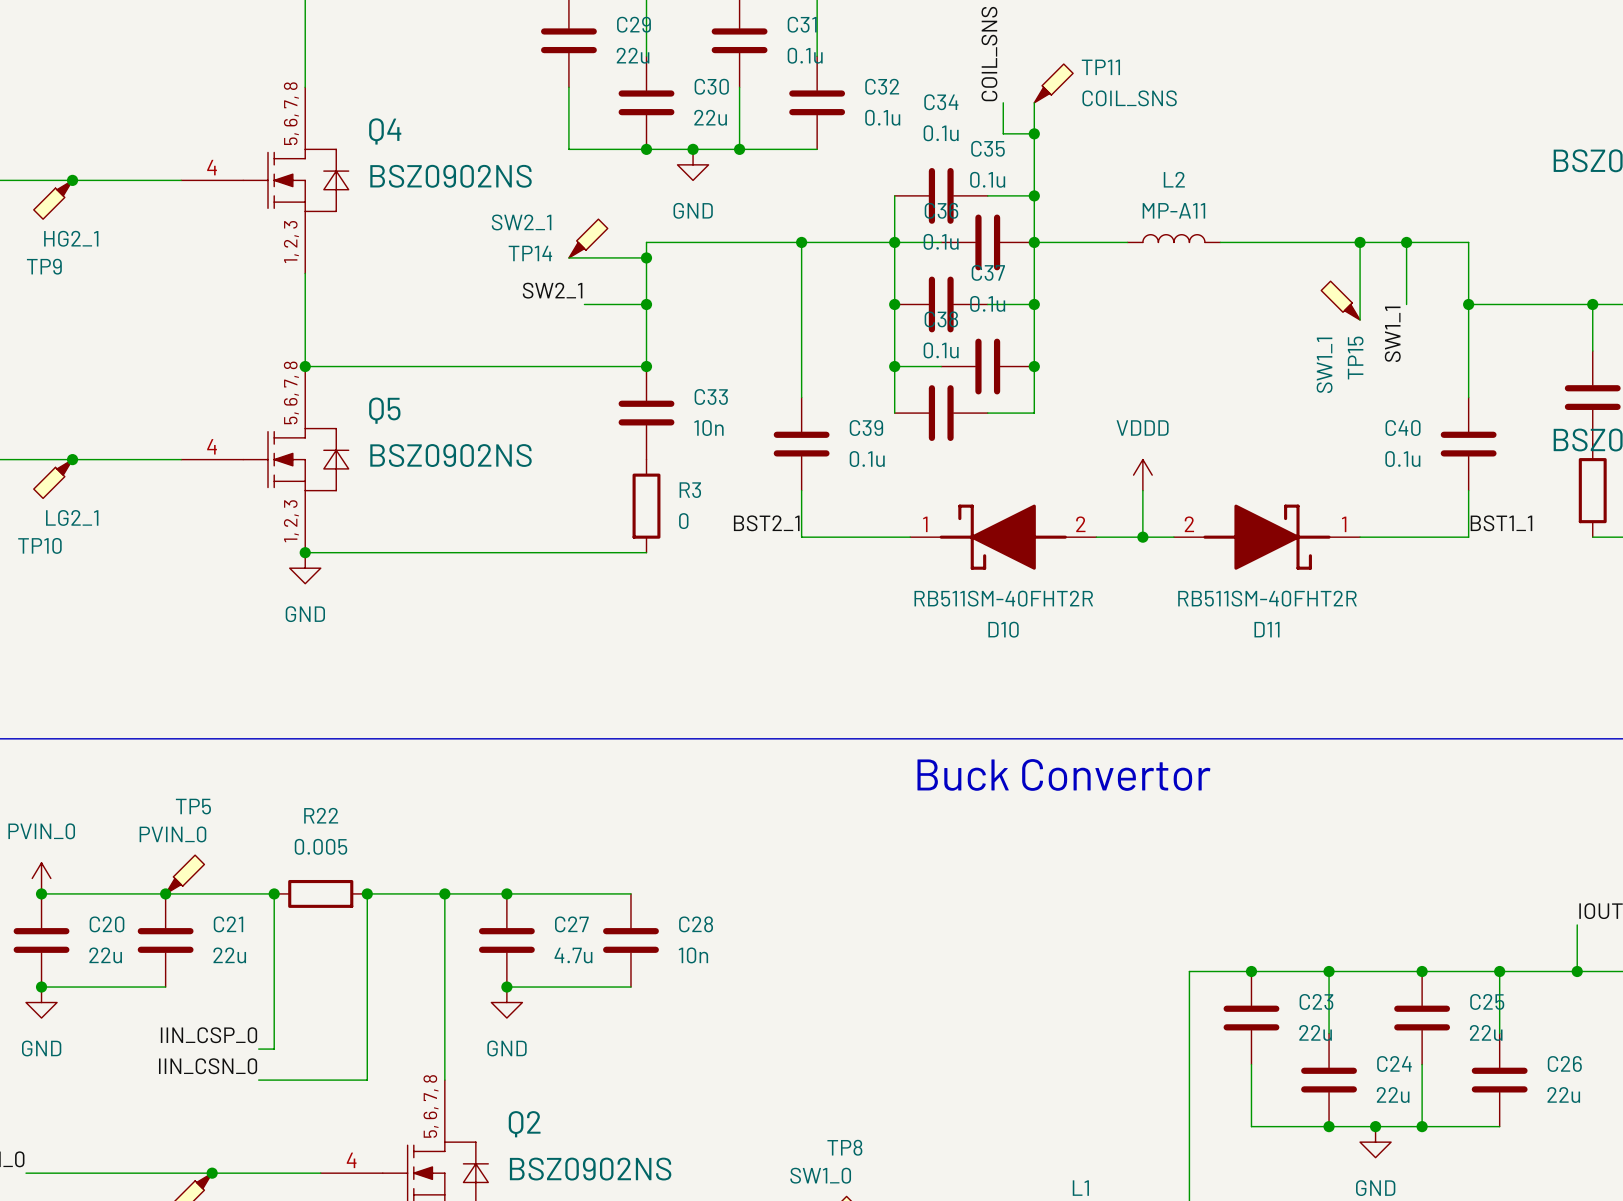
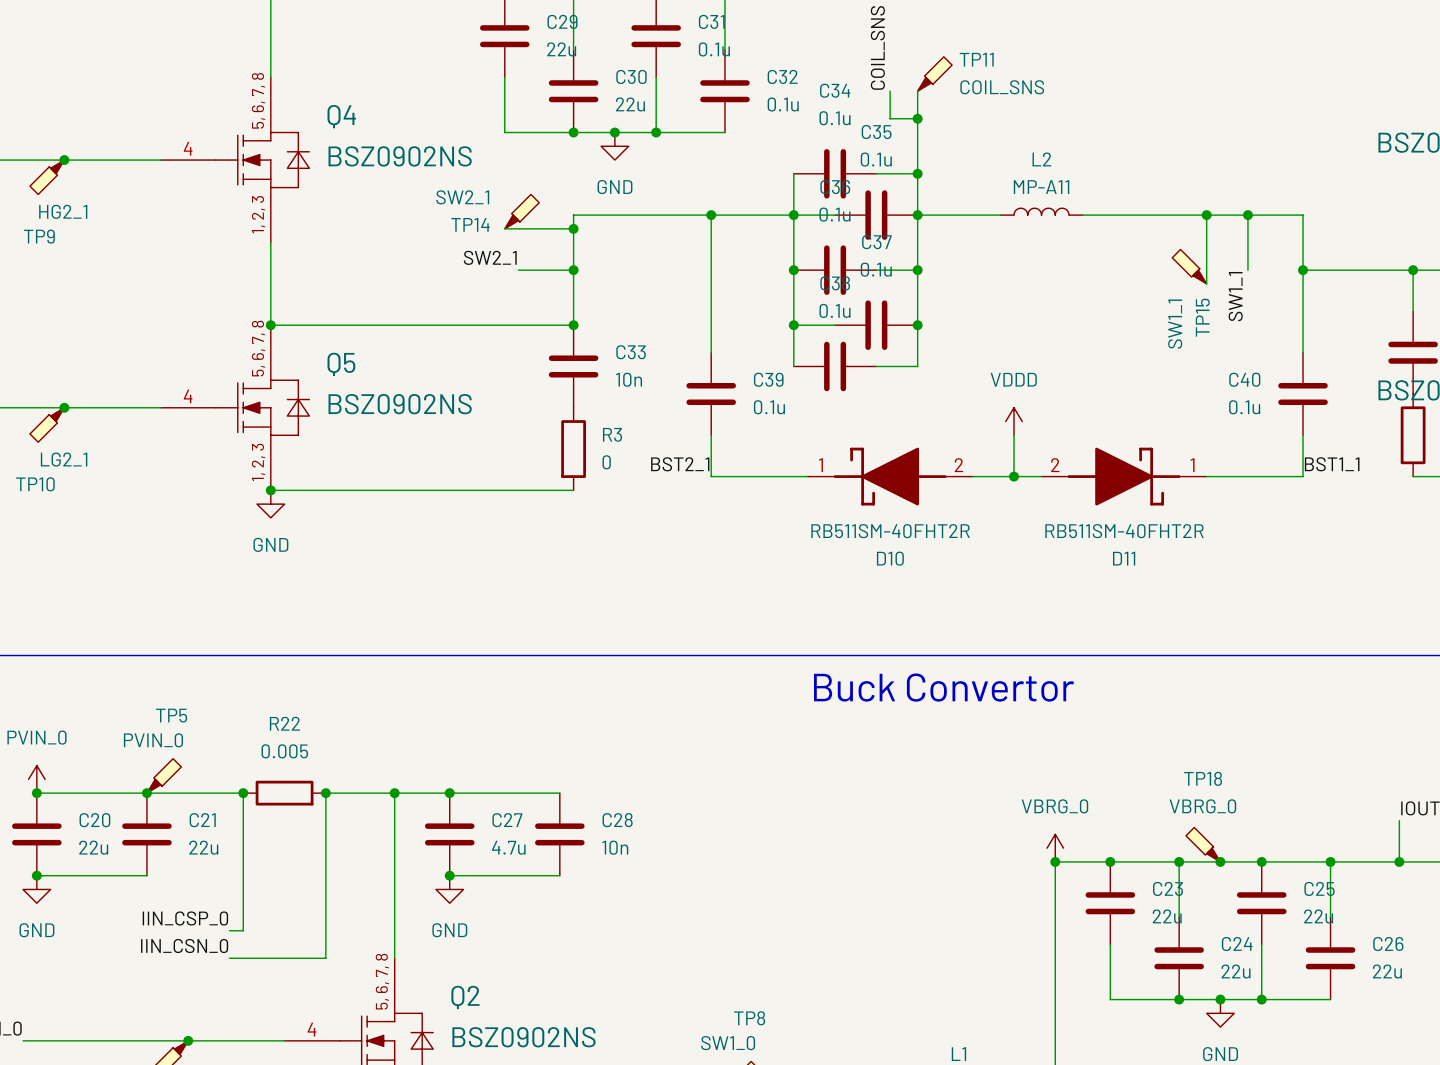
TP18: none -> VBRG_0 (1203, 844)
power symbol: none -> VBRG_0 (1055, 848)
junction: none -> (1055, 861)
junction: none -> (1220, 861)

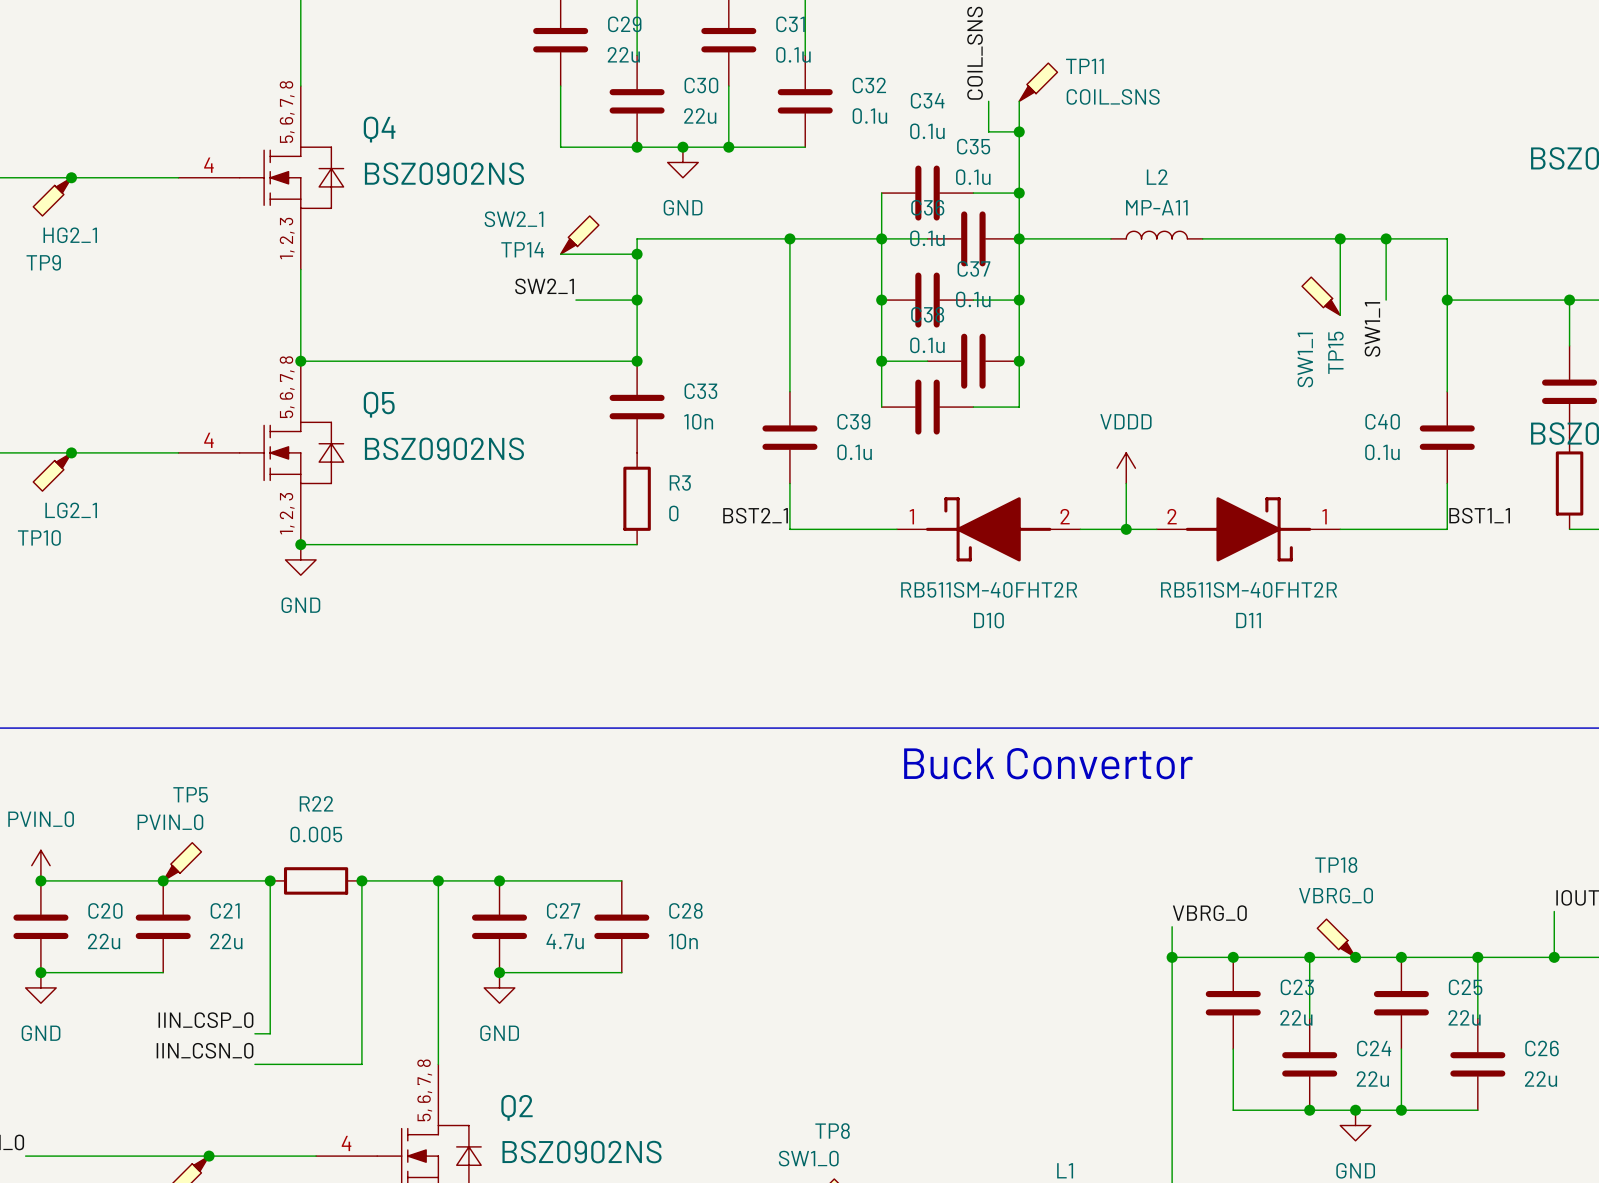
label: none -> VBRG_0 (1209, 913)
power symbol: VBRG_0 (1055, 848) -> none

